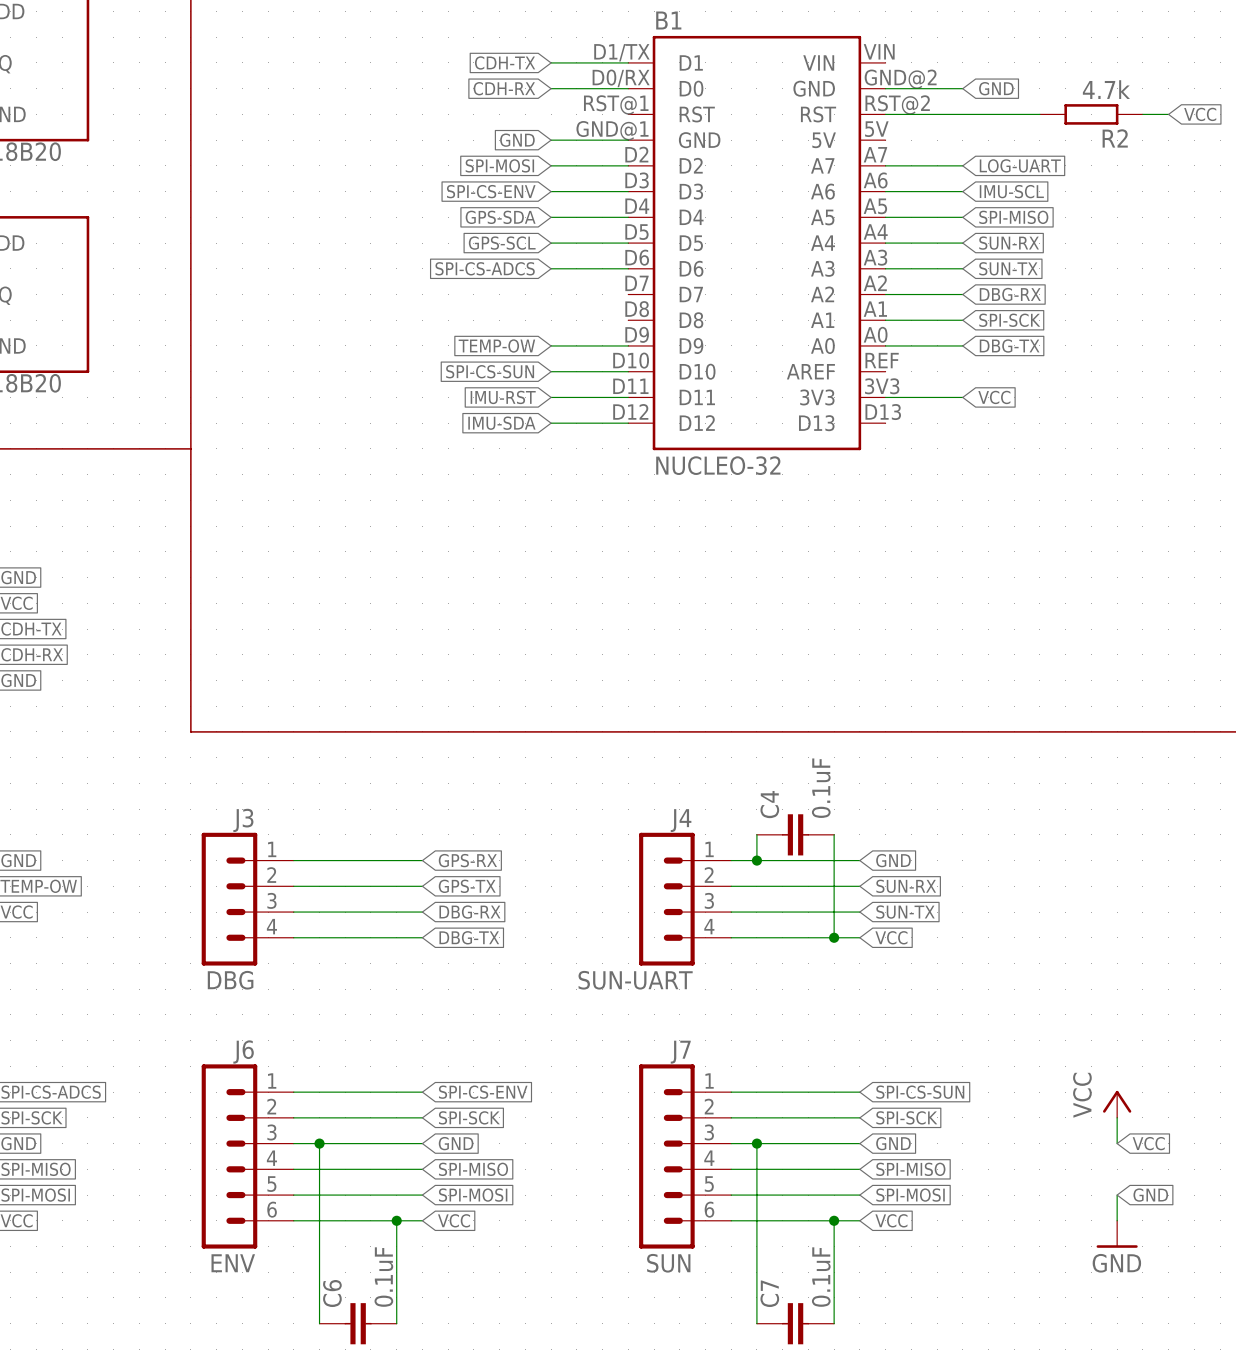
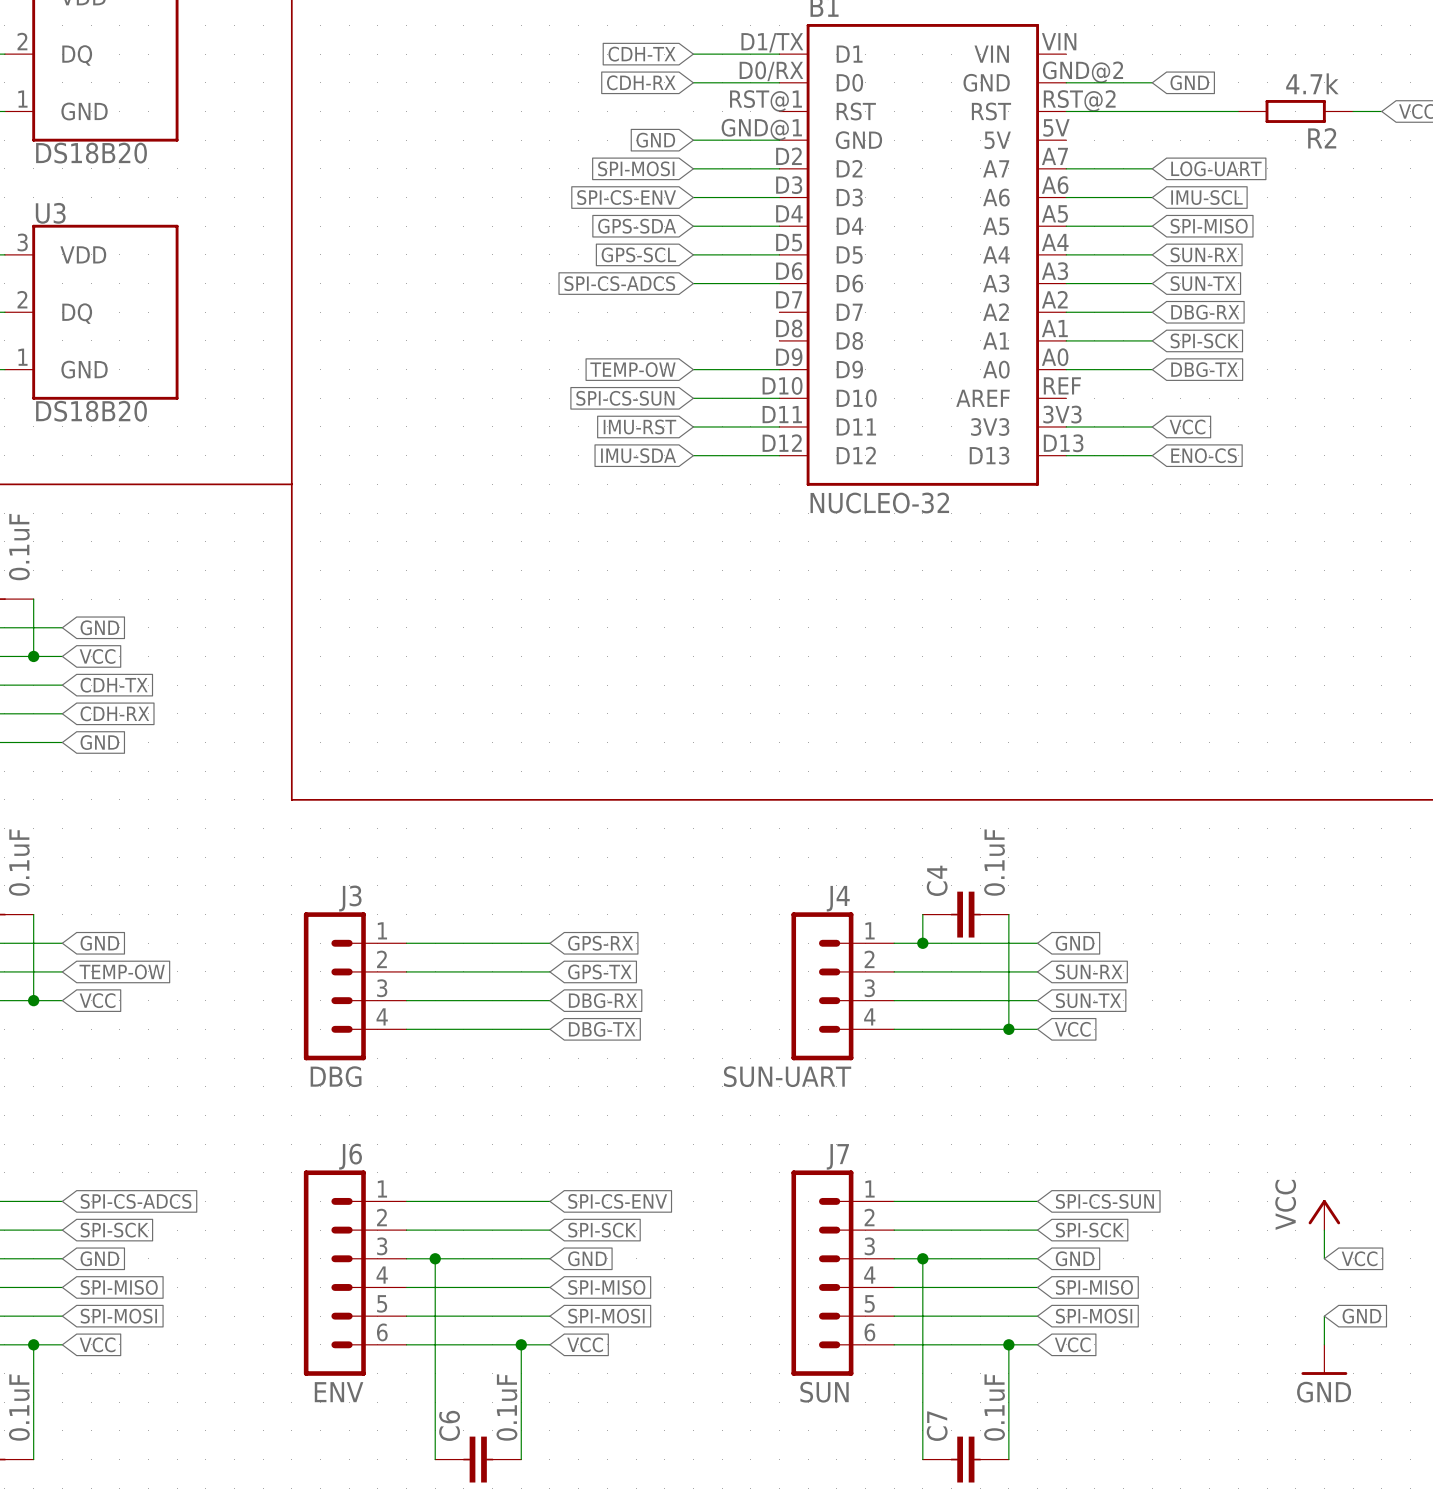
wire: none -> (1066, 455) (1152, 455)
global label: none -> ENO-CS (1204, 455)

